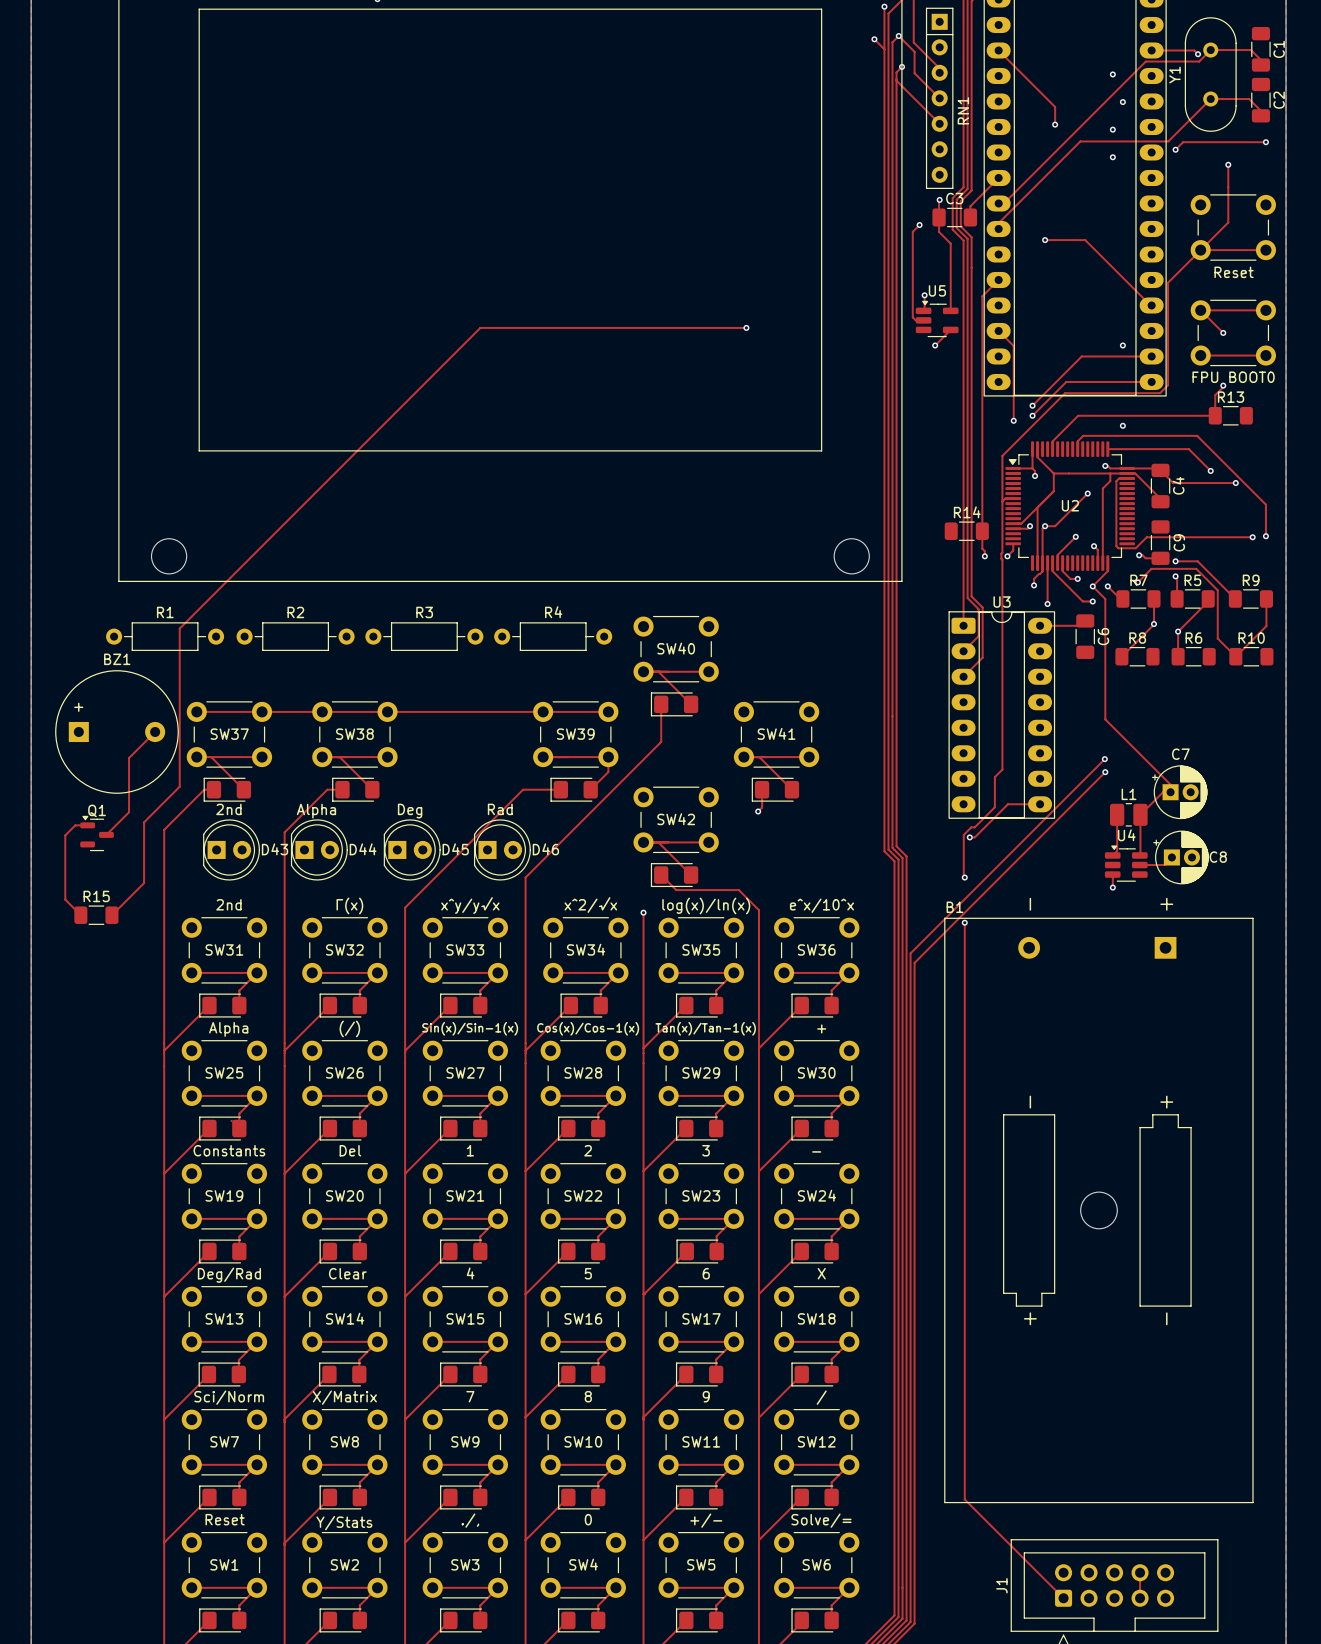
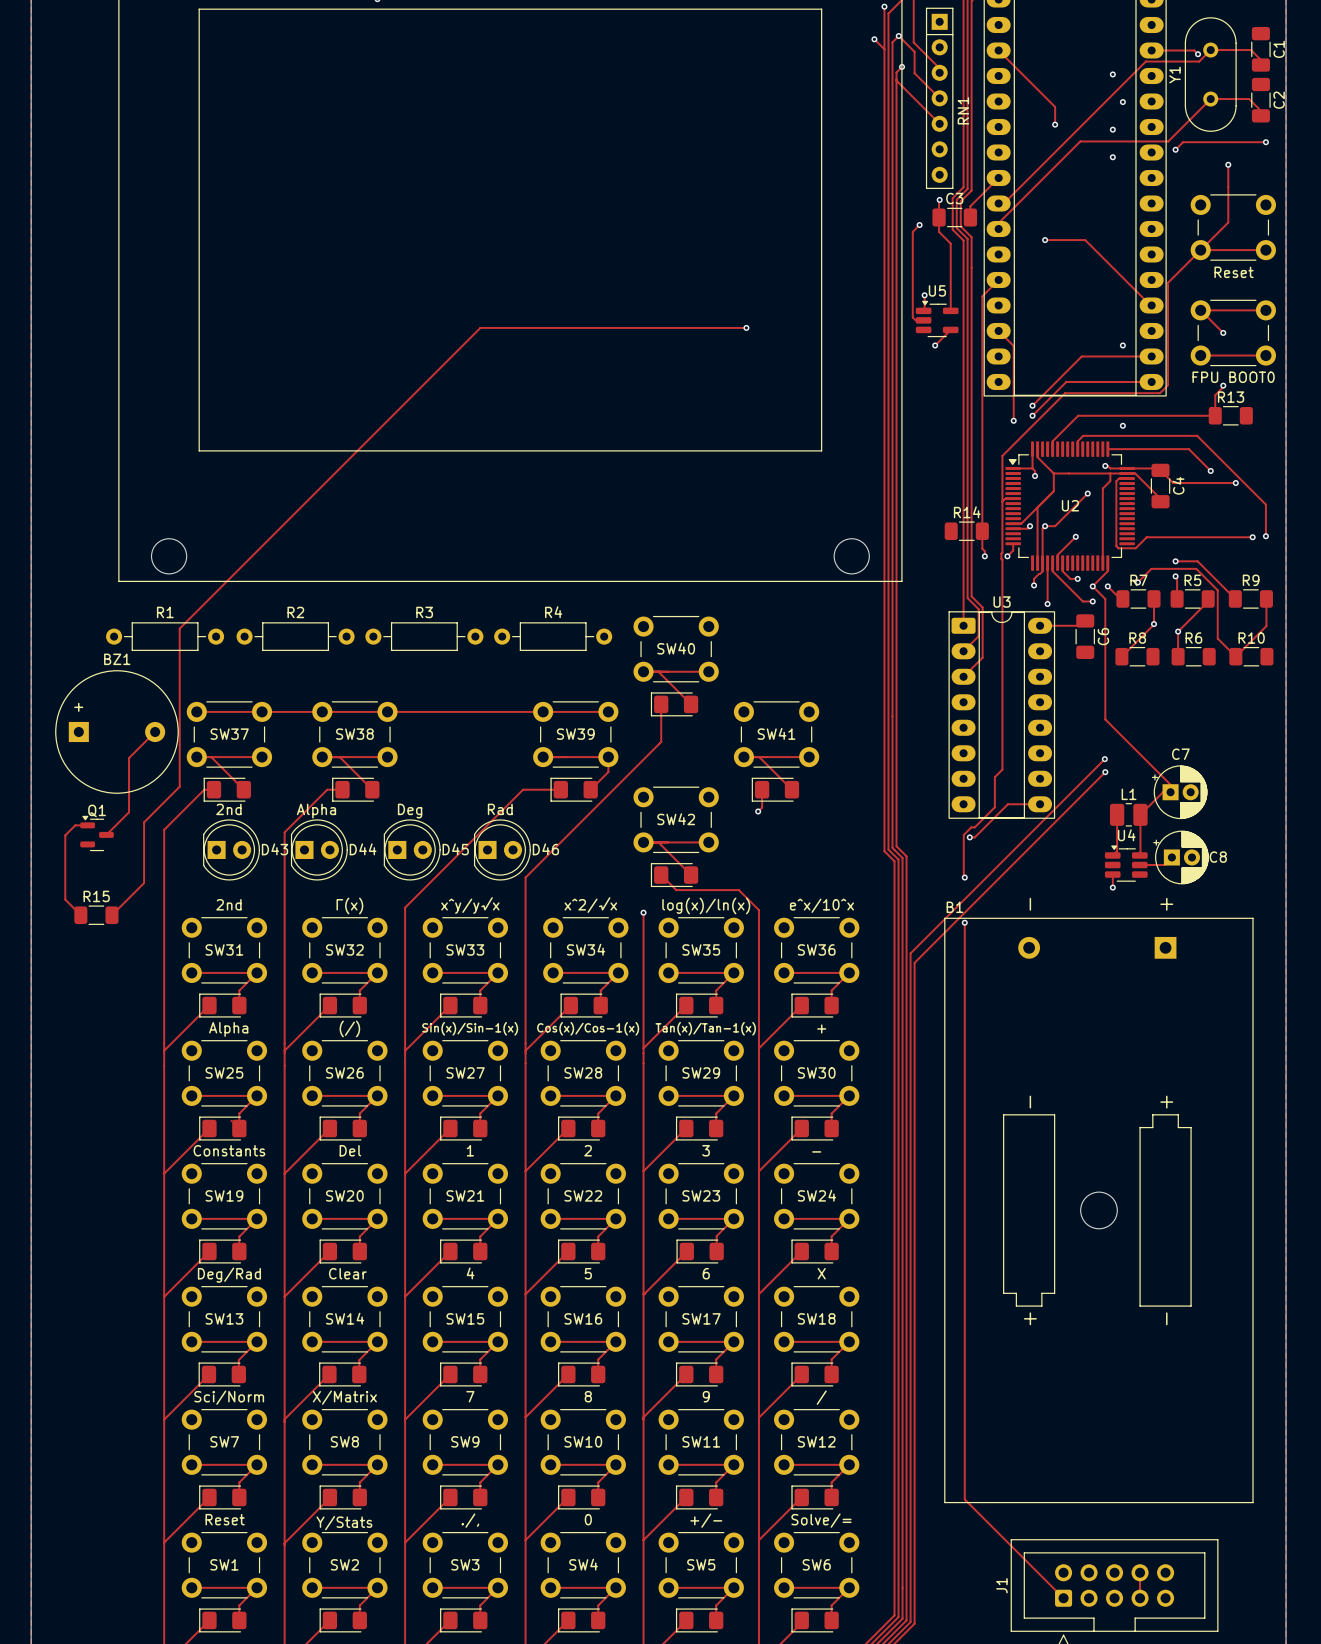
C9: (1160, 542) -> none
track: (1094, 546) (1097, 549) (1097, 563) -> none
via: (1094, 546) -> none
track: (1139, 555) (1145, 558) (1160, 558) -> none
via: (1139, 555) -> none

